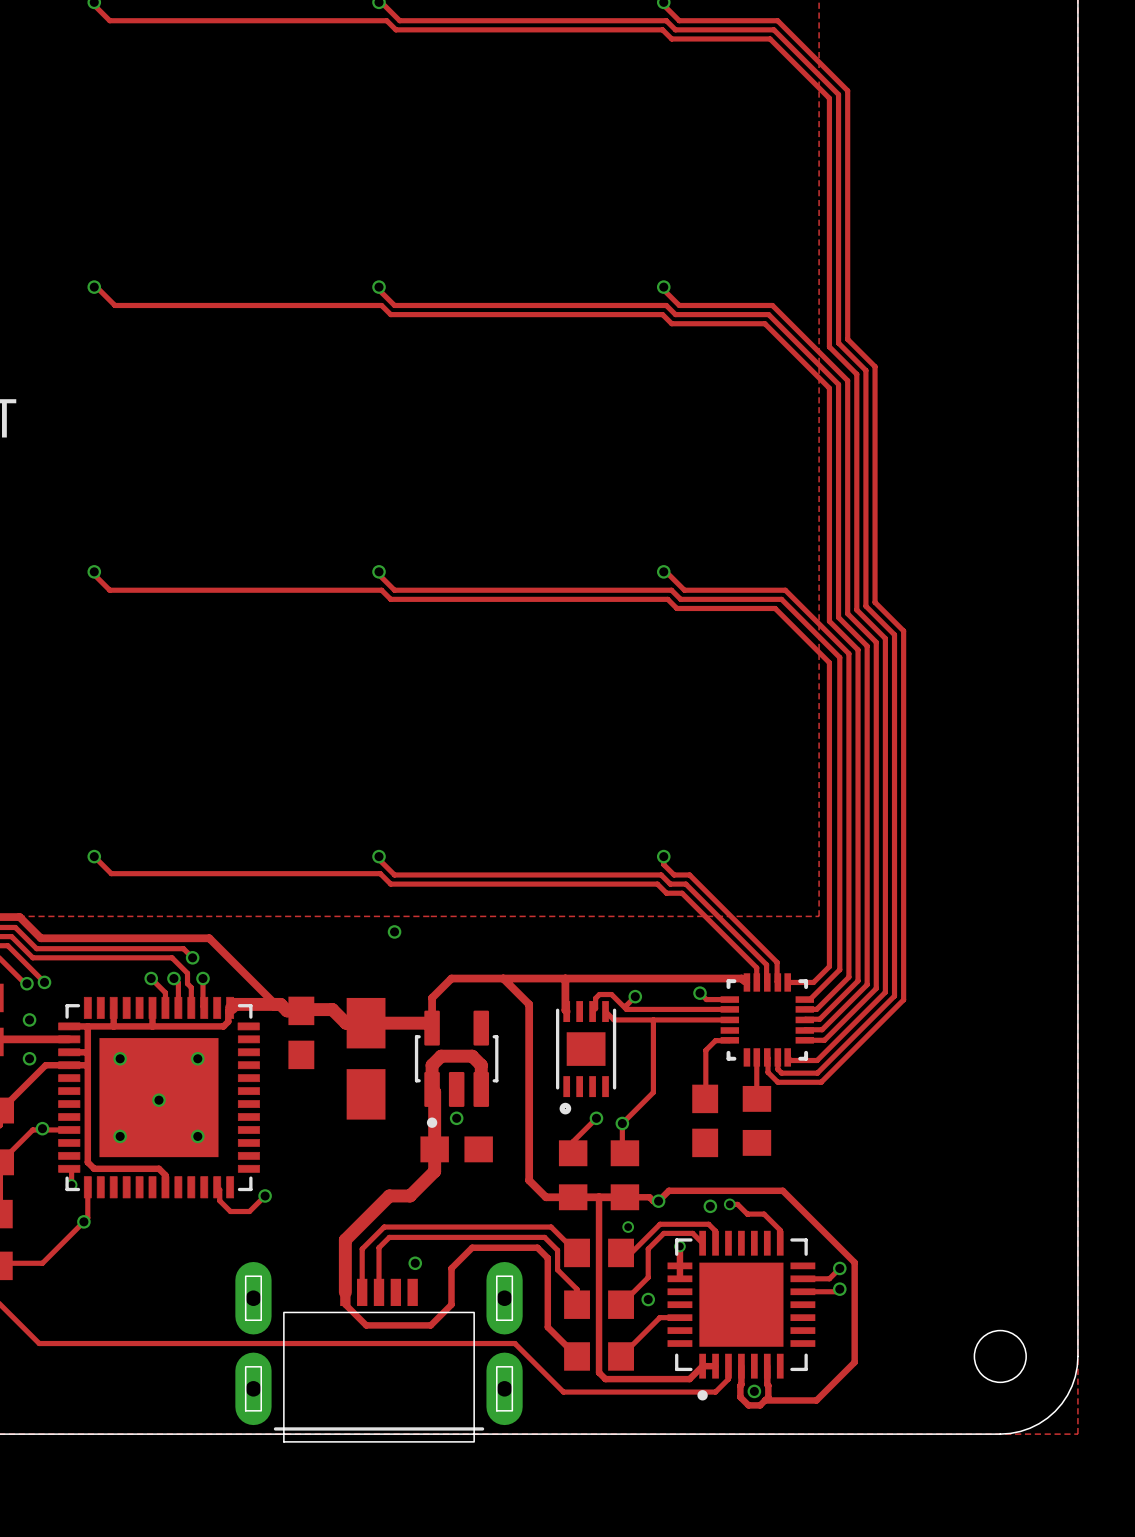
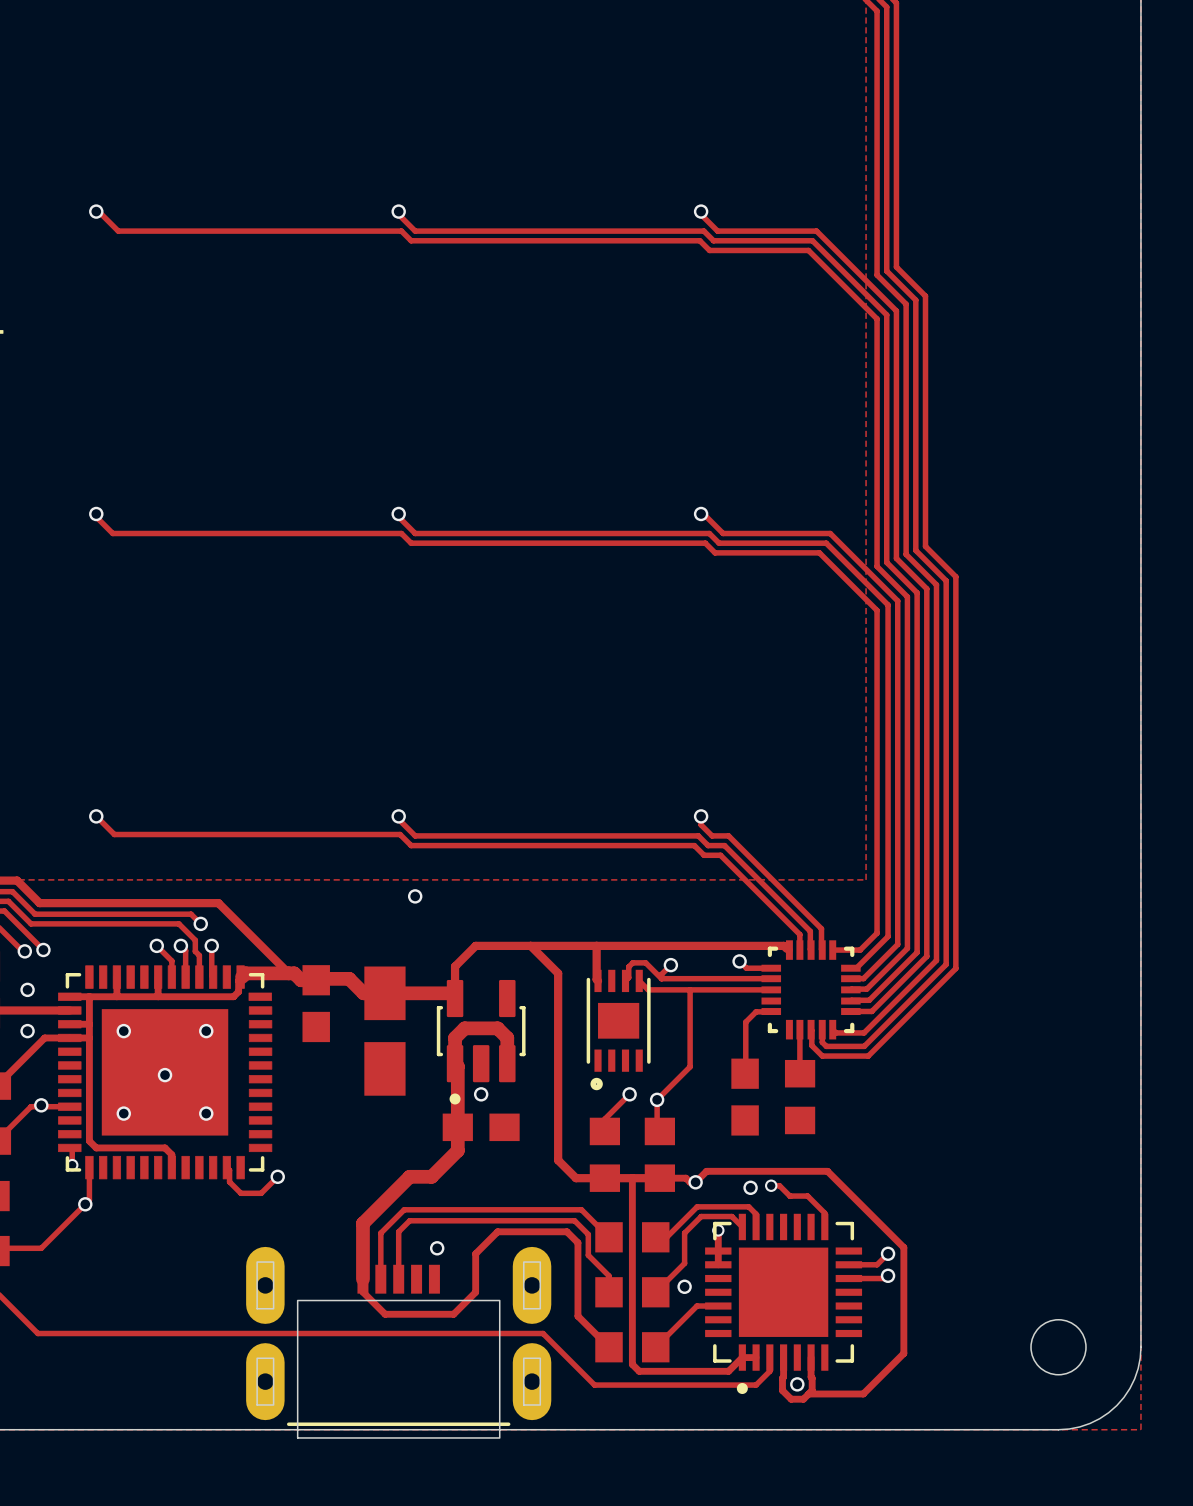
via: (628, 1227) -> none

